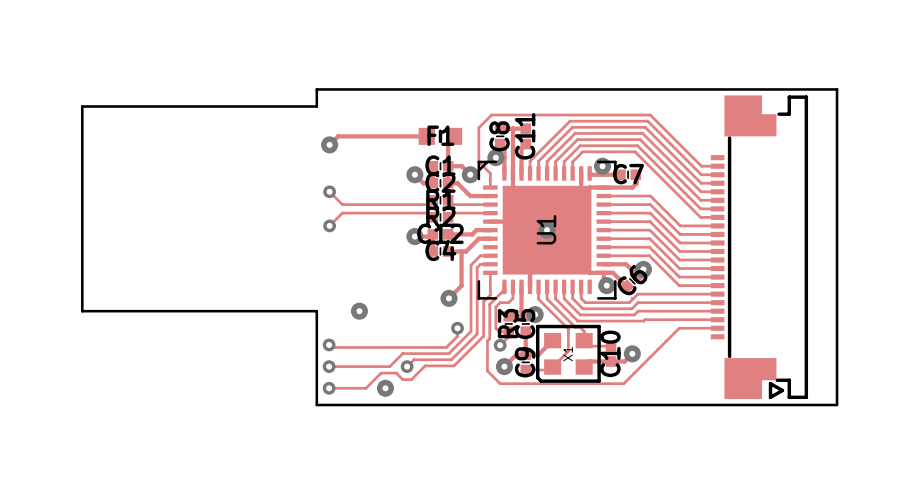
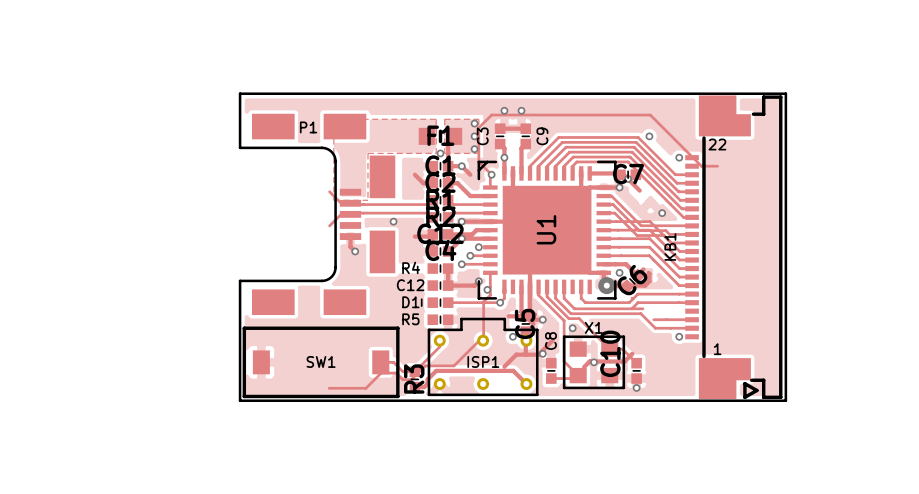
board edge: (316, 89) (316, 106) (82, 106) (82, 311) (316, 311) (316, 404) (837, 404) (837, 89) (316, 89) -> (240, 93) (240, 147) (323, 147) (332, 153) (335, 161) (335, 267) (332, 275) (321, 280) (240, 280) (240, 400) (785, 400) (785, 93) (240, 93)
via: none -> (504, 110)
via: none -> (521, 110)
zone outline: none -> (333, 119) (333, 200) (367, 200) (367, 153) (436, 153) (436, 119) (333, 119)
zone outline: none -> (444, 119) (478, 119) (478, 153) (444, 153) (444, 119)
via: none -> (474, 123)
track: (512, 128) (512, 173) -> none
track: (426, 136) (338, 136) (329, 144) -> none
via: none -> (474, 136)
C8 name: C8 (499, 136) -> C3 (482, 136)
C11 name: C11 (525, 136) -> C9 (542, 136)
via: none -> (649, 136)
via: (329, 144) -> none
text: none -> 22 (717, 144)
via: none -> (474, 149)
via size: [487, 149, 505, 167] -> [500, 153, 509, 162]
via: none -> (440, 153)
via: none -> (679, 157)
via size: [461, 166, 479, 184] -> [457, 162, 466, 171]
track: (530, 166) (530, 161) (570, 121) (647, 121) (701, 174) (717, 174) -> (530, 166) (558, 137) (638, 137) (675, 174) (692, 174)
track: (538, 166) (538, 161) (572, 127) (645, 127) (701, 183) (717, 183) -> (538, 166) (562, 142) (636, 142) (677, 183) (692, 183)
track: (547, 166) (547, 161) (575, 133) (642, 133) (701, 191) (717, 191) -> (547, 166) (566, 147) (634, 147) (678, 191) (692, 191)
track: (555, 166) (555, 161) (577, 139) (640, 139) (700, 200) (717, 200) -> (555, 166) (569, 152) (632, 152) (680, 200) (692, 200)
track: (564, 166) (564, 161) (580, 145) (637, 145) (700, 208) (717, 208) -> (564, 166) (573, 157) (630, 157) (681, 208) (692, 208)
track: (572, 166) (572, 161) (582, 151) (635, 151) (700, 217) (717, 217) -> (572, 166) (576, 161) (628, 161) (683, 217) (692, 217)
via: (602, 166) -> none
track: (589, 173) (620, 174) (619, 173) -> (589, 173) (622, 173) (639, 190)
via: (414, 174) -> none
via: none -> (491, 174)
track: (635, 174) (636, 183) (632, 187) (619, 187) -> none
via: none -> (628, 179)
via: none -> (619, 187)
via: (329, 191) -> none
track: (611, 196) (650, 196) (680, 225) (717, 225) -> (611, 196) (641, 225) (691, 225)
track: (613, 204) (650, 204) (680, 234) -> (613, 204) (639, 230) (665, 230) (669, 234) (680, 234)
track: (614, 213) (650, 213) (680, 242) -> (614, 213) (637, 235) (663, 235) (671, 242) (680, 242)
via: none -> (662, 213)
P1: none -> (323, 214)
via: none -> (393, 221)
track: none -> (461, 221) (490, 221)
via: none -> (461, 221)
via: (329, 225) -> none
via: (547, 230) -> none
track: (692, 234) (717, 234) -> none
track: none -> (350, 236) (350, 246) (355, 251)
via: (414, 236) -> none
via: none -> (461, 238)
track: (478, 238) (466, 251) (449, 251) -> (478, 238) (461, 238) (449, 251)
track: (692, 242) (717, 242) -> none
via: none -> (478, 247)
KB1: none -> (733, 247)
part: (759, 247) -> none
via: none -> (355, 251)
track: (461, 251) (461, 285) (449, 298) -> none
track: (692, 251) (717, 251) -> none
via: none -> (470, 255)
track: (480, 255) (471, 265) (471, 331) (448, 353) (402, 353) (389, 366) (329, 366) -> (480, 255) (470, 255)
track: (692, 260) (717, 260) -> none
via: none -> (461, 264)
track: (480, 264) (477, 267) (477, 334) (451, 359) (413, 359) (407, 366) -> (480, 264) (461, 264)
R4: none -> (440, 268)
track: none -> (448, 268) (448, 285) (474, 285) (478, 281)
track: (692, 268) (717, 268) -> none
via: (643, 269) -> none
track: (603, 272) (612, 272) (626, 286) -> none
via: none -> (619, 272)
track: none -> (648, 272) (649, 281) (645, 285) (606, 285)
track: (692, 277) (717, 277) -> none
via: none -> (478, 281)
C12: none -> (440, 285)
track: (692, 285) (717, 285) -> none
track: (504, 286) (504, 289) (489, 304) (489, 338) (487, 341) (487, 370) (500, 383) (623, 383) (679, 328) -> none
track: (512, 286) (512, 298) (508, 302) (500, 302) (495, 306) (495, 328) (499, 331) (508, 331) (508, 336) (500, 345) -> none
track: none -> (530, 286) (530, 316) (533, 319) (542, 319)
track: (572, 286) (572, 298) (582, 308) -> (564, 298) (574, 308) (582, 308)
via: none -> (487, 289)
track: none -> (504, 292) (504, 298) (500, 302) (448, 302)
track: (692, 294) (717, 294) -> none
track: (538, 295) (538, 299) (568, 329) (568, 351) (549, 370) (525, 370) -> (538, 295) (564, 320) (564, 361) (578, 375) (575, 378) (551, 378)
track: (547, 296) (547, 299) (575, 327) (580, 327) (584, 331) (584, 340) (589, 346) (611, 346) -> (547, 296) (568, 318) (579, 318) (609, 349) (622, 349) (636, 363)
via: (449, 298) -> none
track: (555, 298) (577, 321) (653, 319) -> (555, 298) (570, 313) (640, 313) (655, 328) (679, 328)
track: (564, 298) (580, 314) (634, 314) (638, 311) (717, 311) -> none
D1: none -> (437, 302)
via: none -> (500, 302)
track: (692, 302) (717, 302) -> none
via size: [526, 306, 544, 324] -> [538, 315, 547, 324]
via: (359, 311) -> none
R5: none -> (440, 319)
track: (692, 319) (717, 319) -> none
track: none -> (530, 320) (533, 323)
R3 position: (508, 323) -> (414, 379)
X1 footprint: [535, 324, 601, 383] -> [562, 335, 626, 390]
track: (457, 328) (457, 336) (446, 347) (331, 347) (329, 344) -> none
via: (457, 328) -> none
via: none -> (572, 328)
track: (692, 328) (717, 328) -> none
via: none -> (512, 336)
via: none -> (679, 336)
track: none -> (439, 340) (439, 346) (414, 371) (402, 371) (393, 362) (380, 362)
via: (329, 344) -> none
via: (500, 345) -> none
text: none -> 1 (717, 349)
via: none -> (542, 353)
C10 position: (611, 353) -> (636, 370)
via: (632, 353) -> none
ISP1: none -> (483, 356)
SW1: none -> (321, 362)
C9: (525, 362) -> none
via: none -> (593, 362)
via: (329, 366) -> none
via: (407, 366) -> none
via: (504, 366) -> none
C8: none -> (551, 370)
track: none -> (526, 384) (513, 370) (436, 370) (427, 379) (427, 383) (424, 387) (414, 387)
via: none -> (636, 387)
via: (329, 388) -> none
via: (385, 388) -> none

